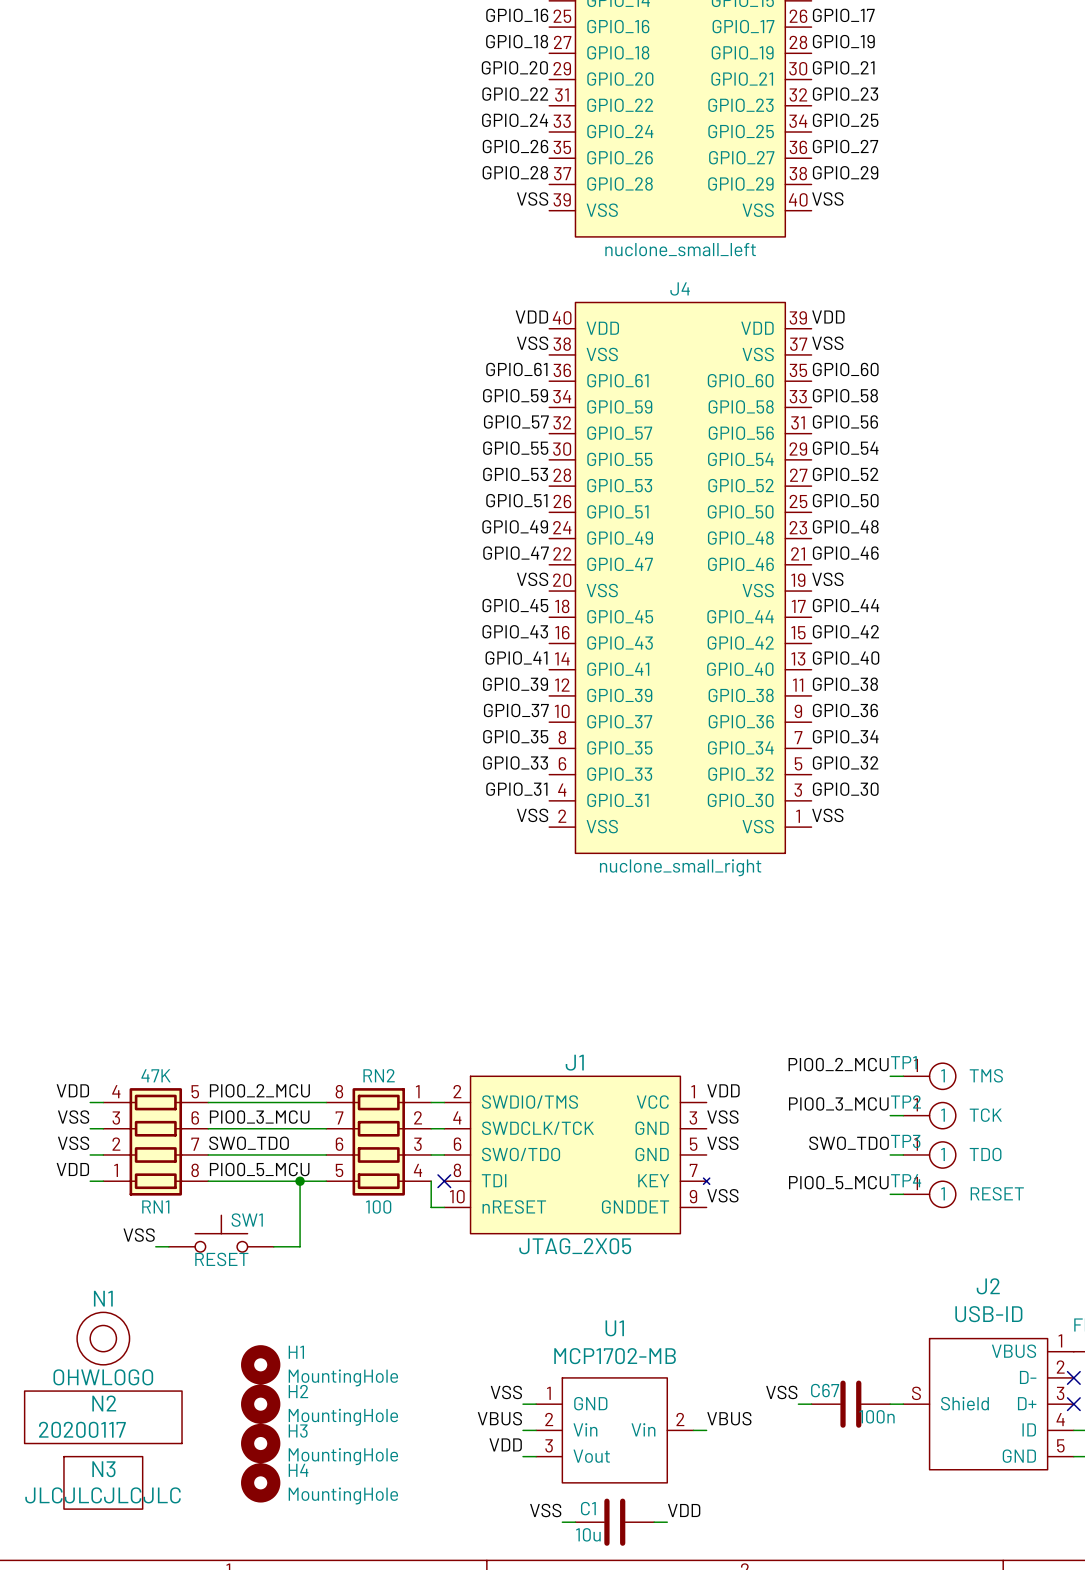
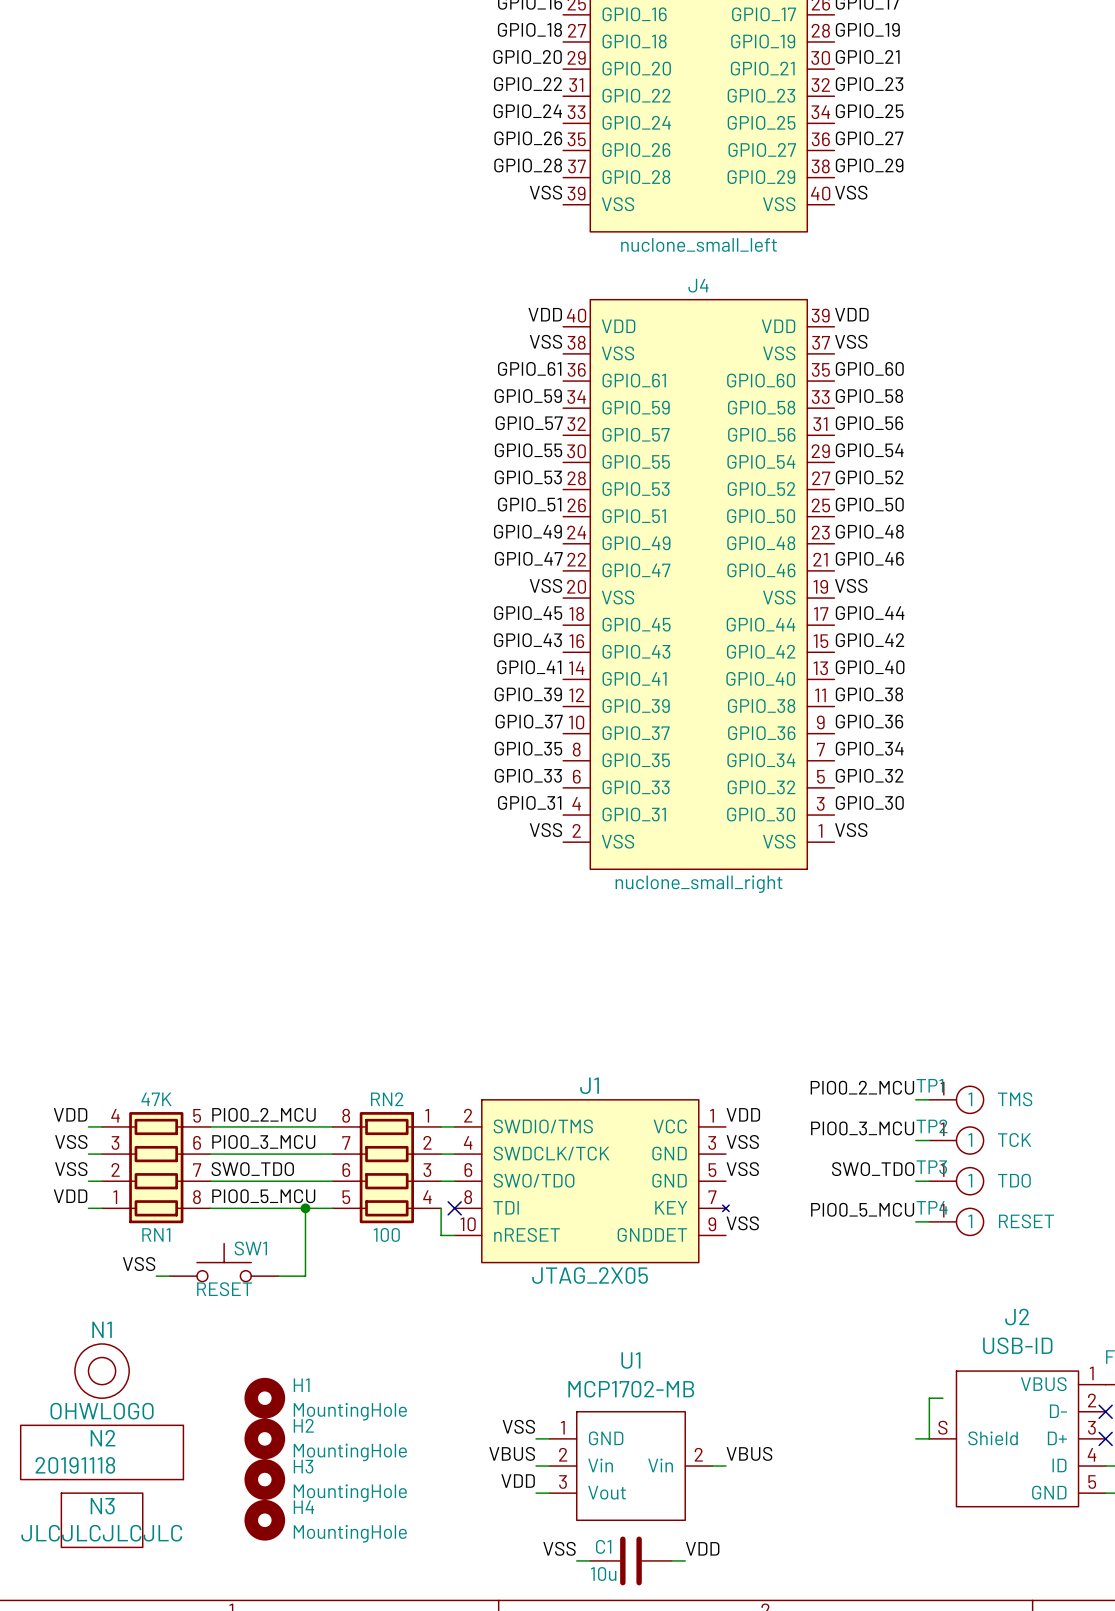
wire: none -> (942, 1398) (929, 1398) (929, 1438)
label: VSS (781, 1392) -> none
wire: (798, 1404) (811, 1404) -> none
C67: 100n (850, 1404) -> none
N2 value: 20200117 (82, 1429) -> 20191118 (75, 1465)

